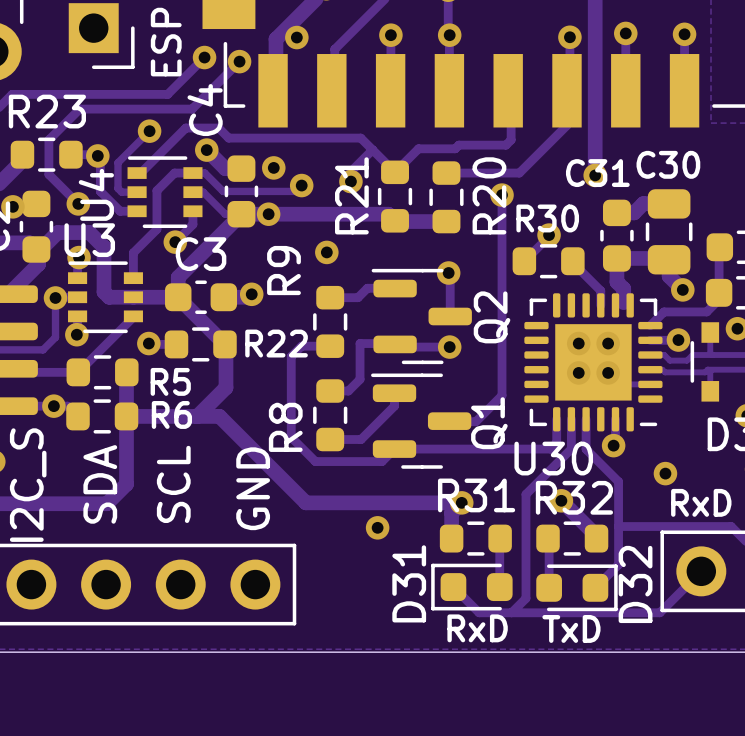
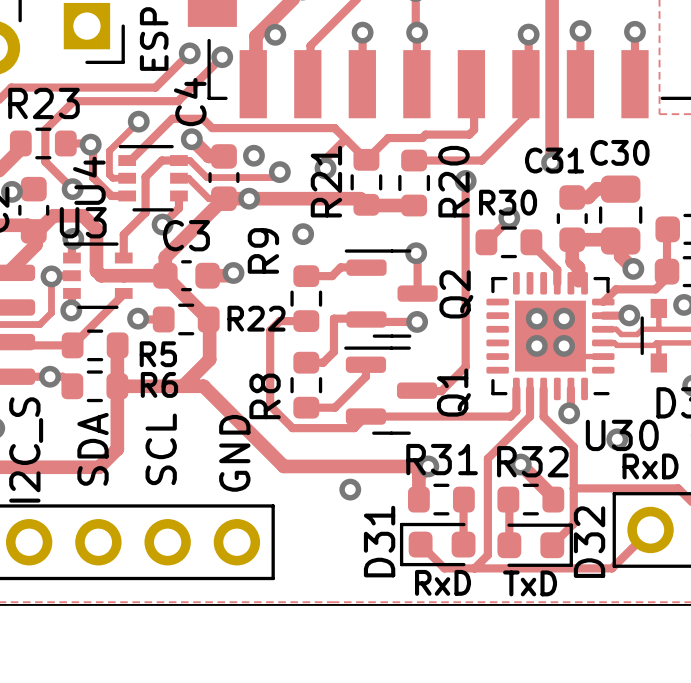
U30 name position: U30 (553, 458) -> U30 (622, 435)

